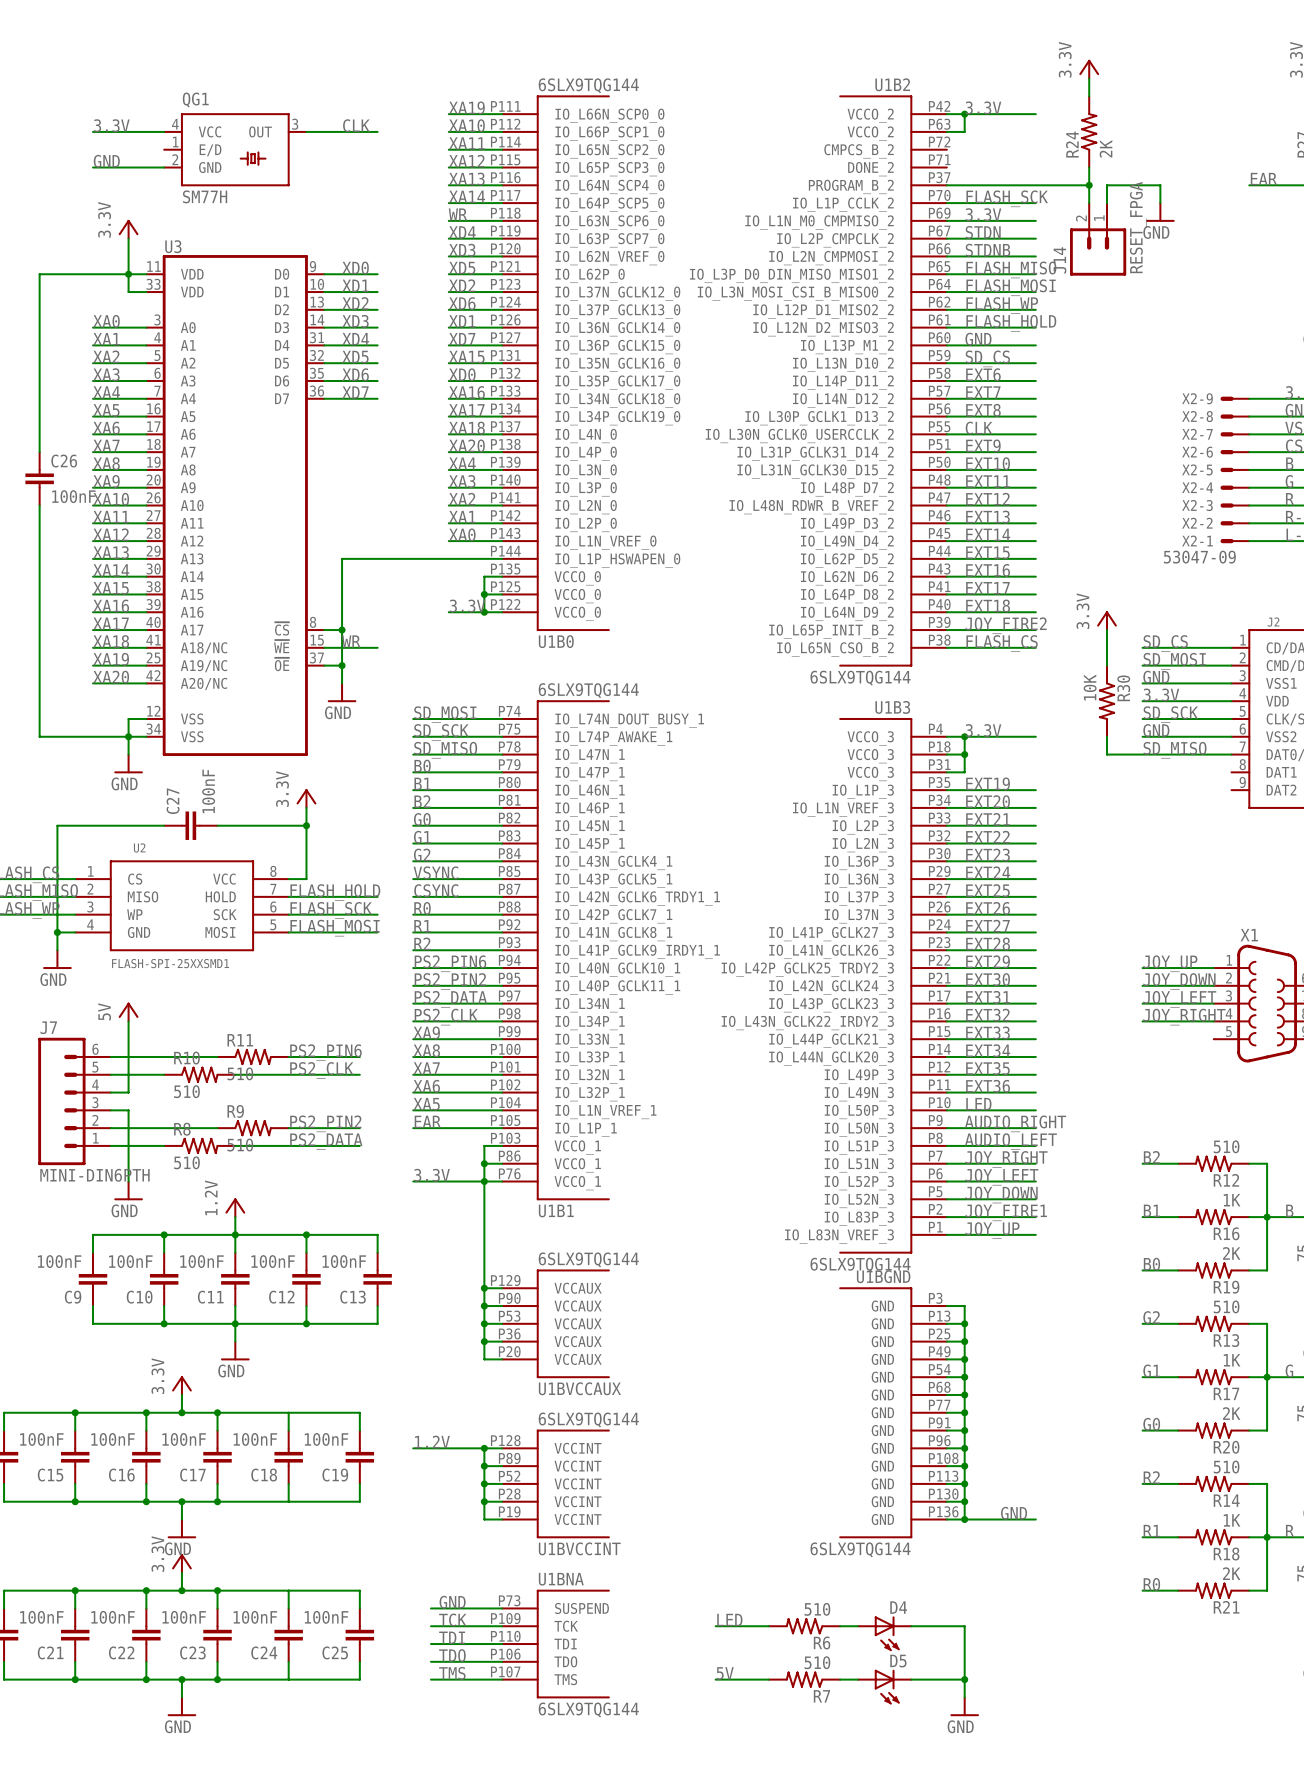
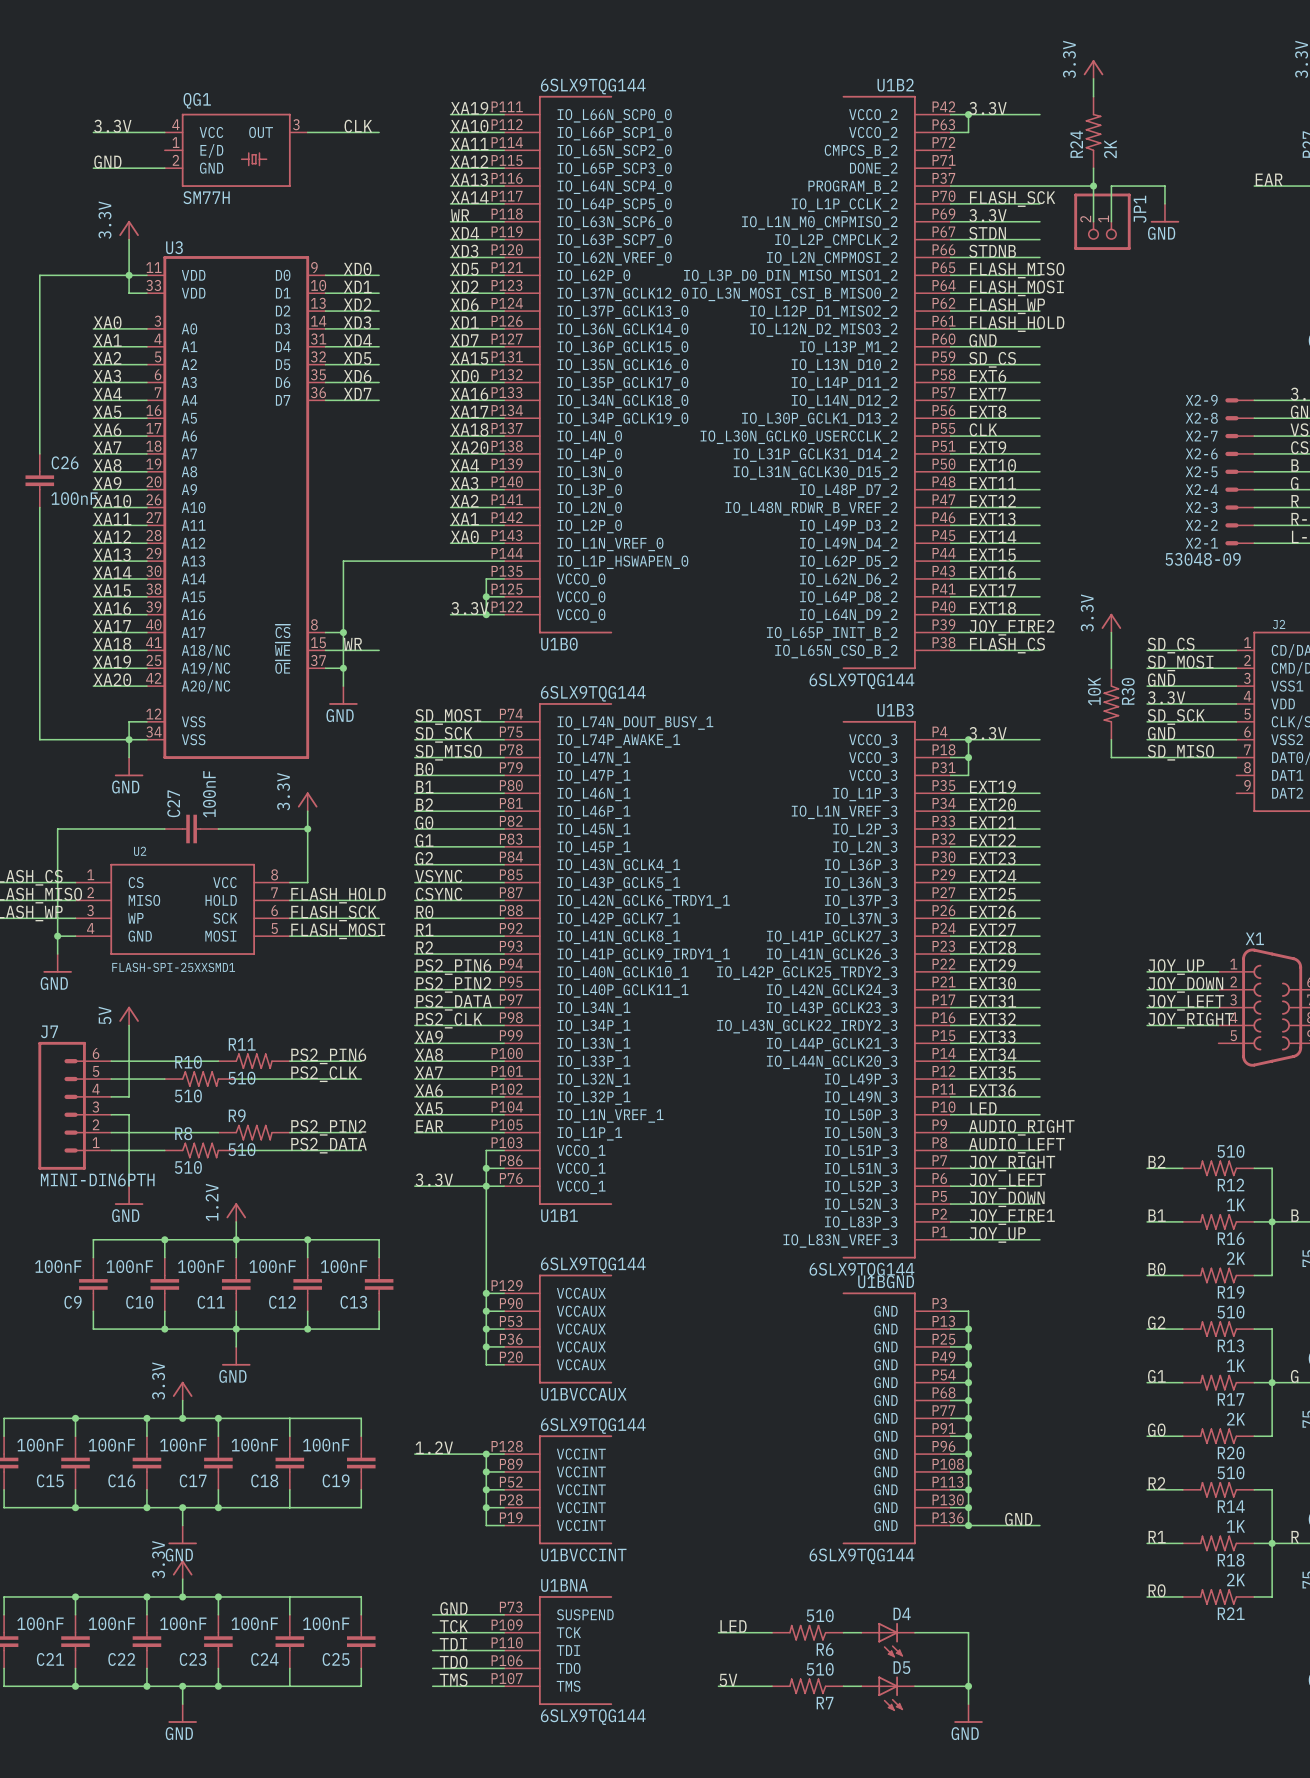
JP1: none -> (1102, 221)
J14: RESET_FPGA (1098, 239) -> none
X2-1 value: 53047-09 (1199, 557) -> 53048-09 (1203, 559)

